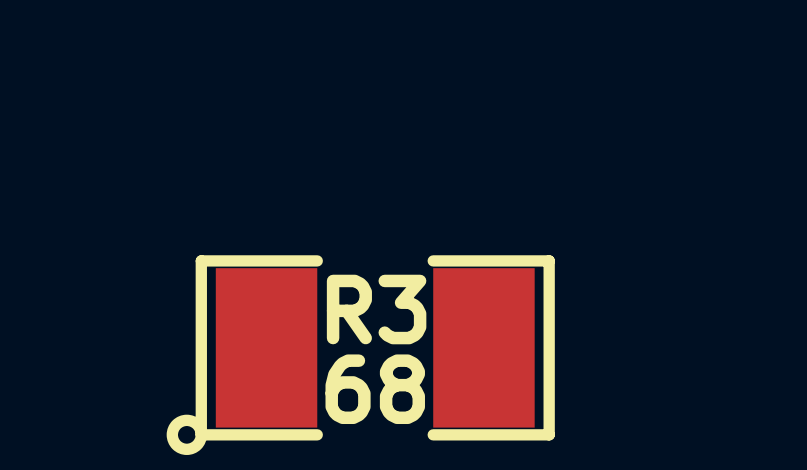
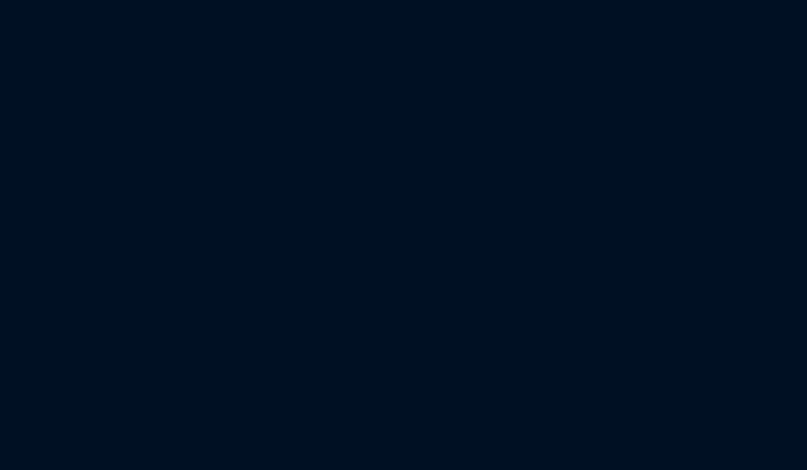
R3: 68 (360, 355) -> none

